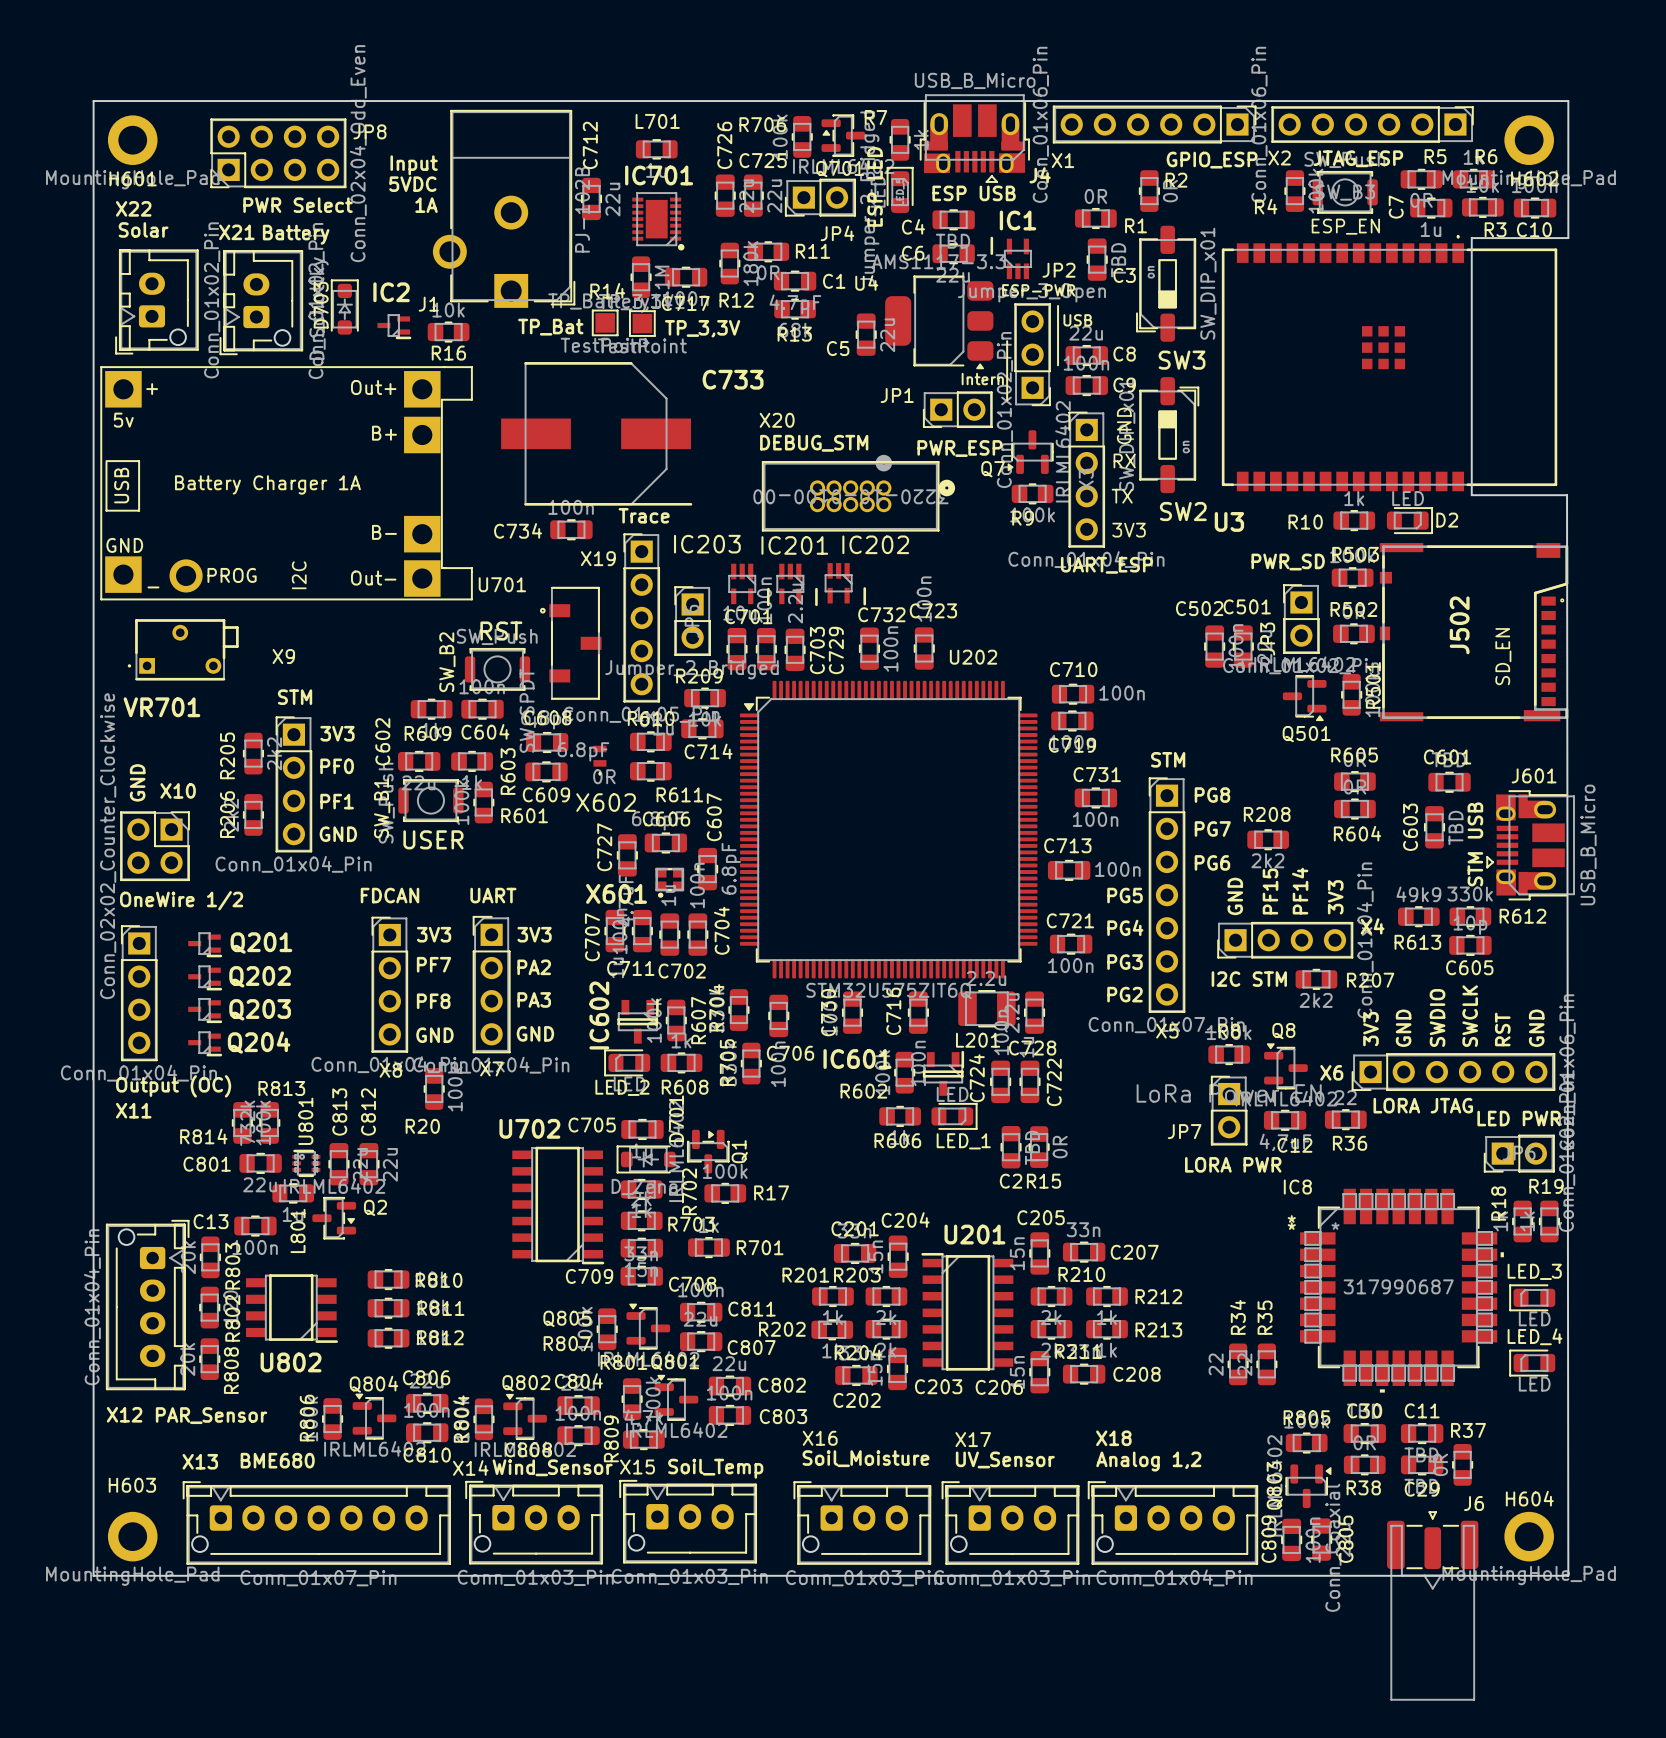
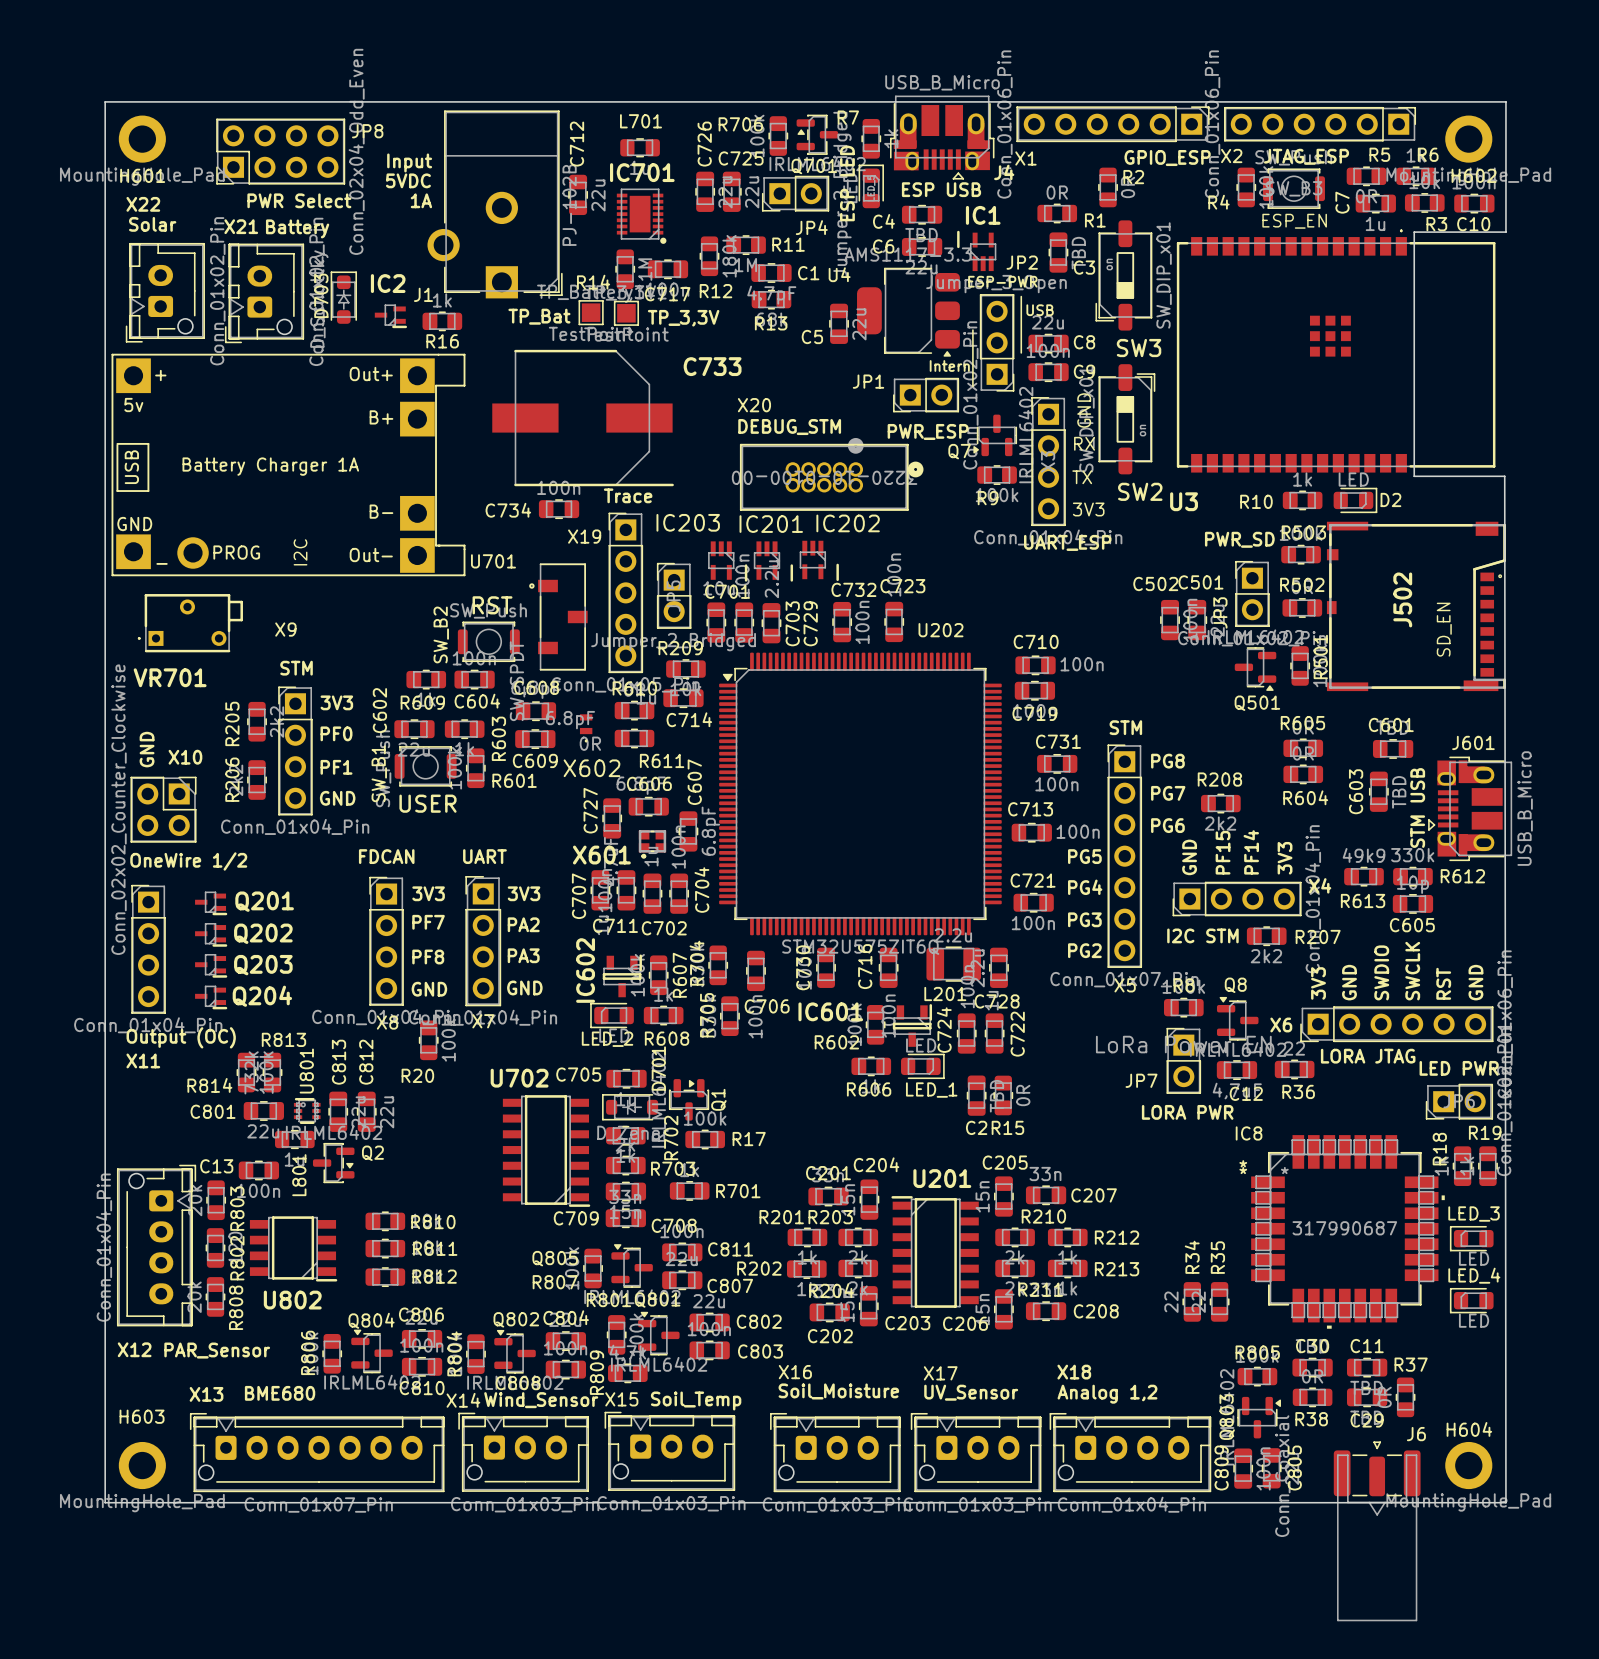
R11 value: 0R (768, 272) -> 1M (745, 265)
R16 value: 10k (448, 310) -> 1k (442, 300)

